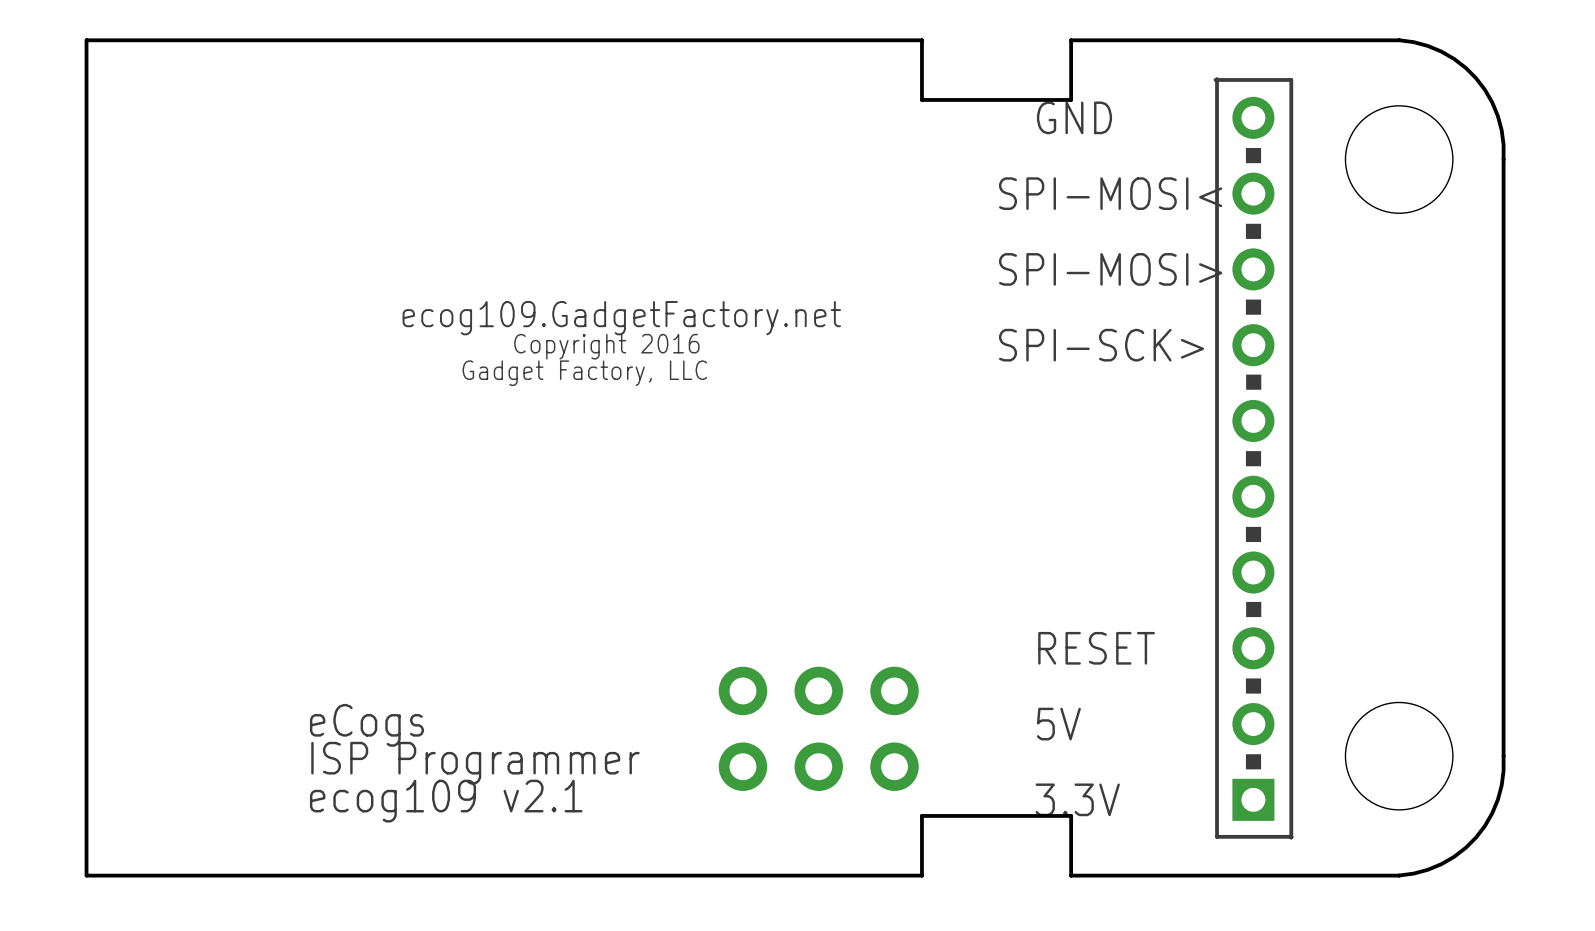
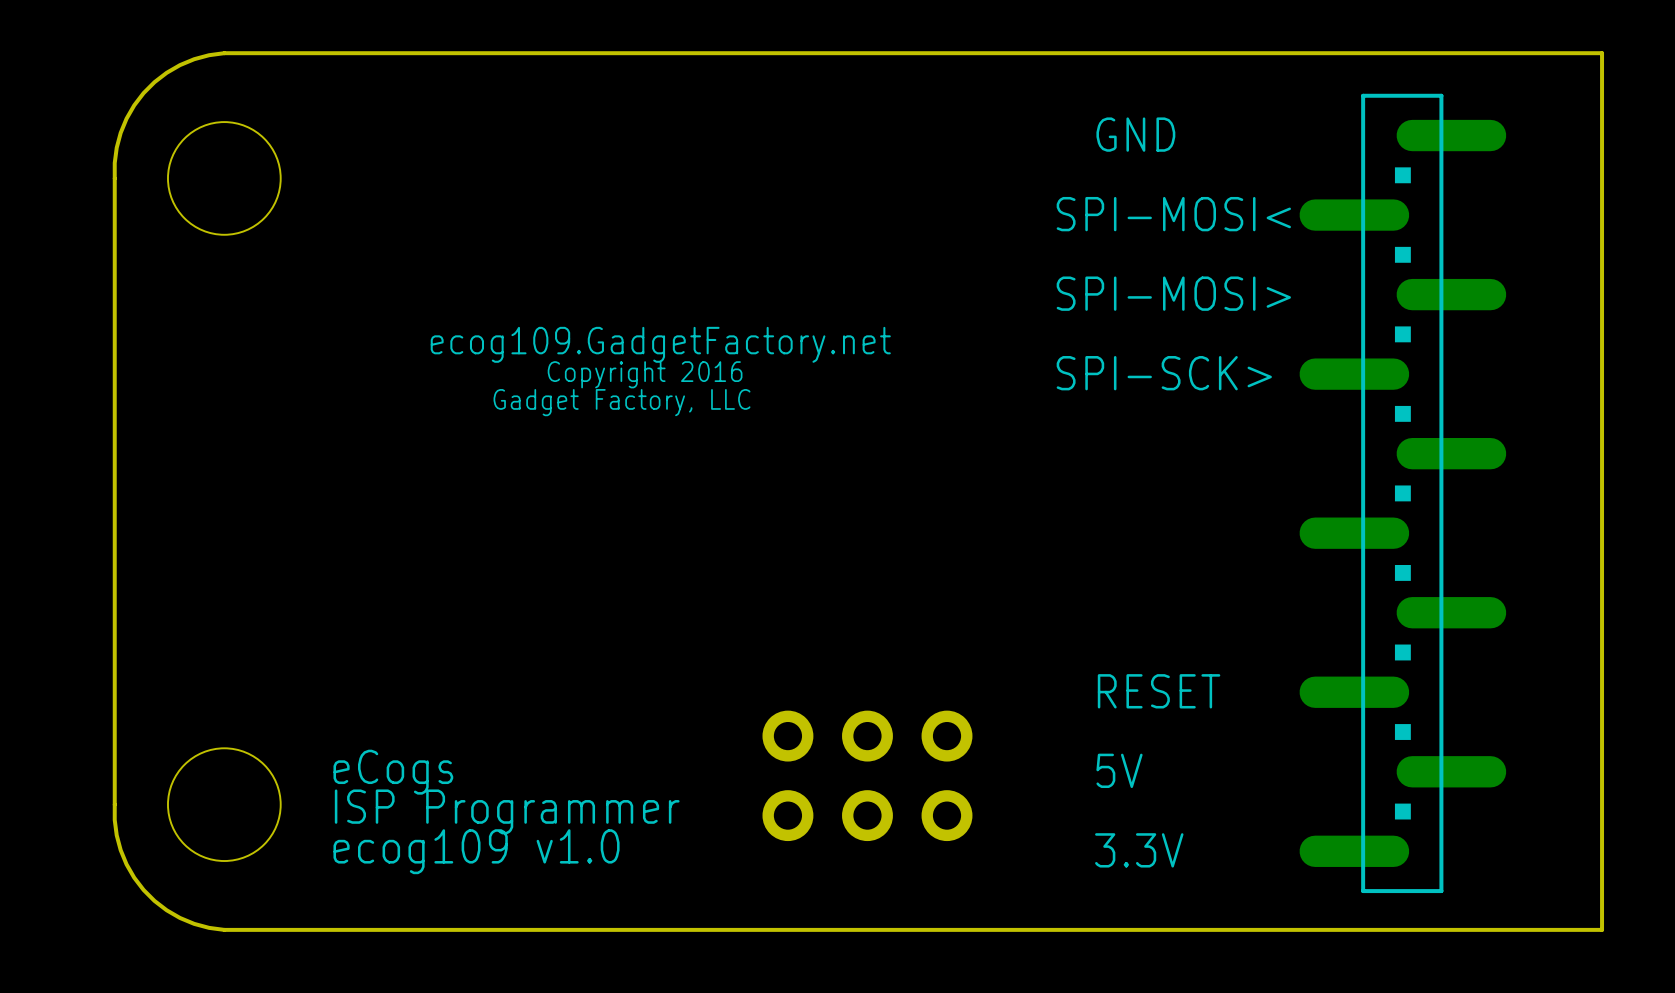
part footprint: [84, 38, 1506, 878] -> [112, 51, 1605, 932]
text: ecog109 v2.1 (446, 801) -> ecog109 v1.0 (476, 851)

